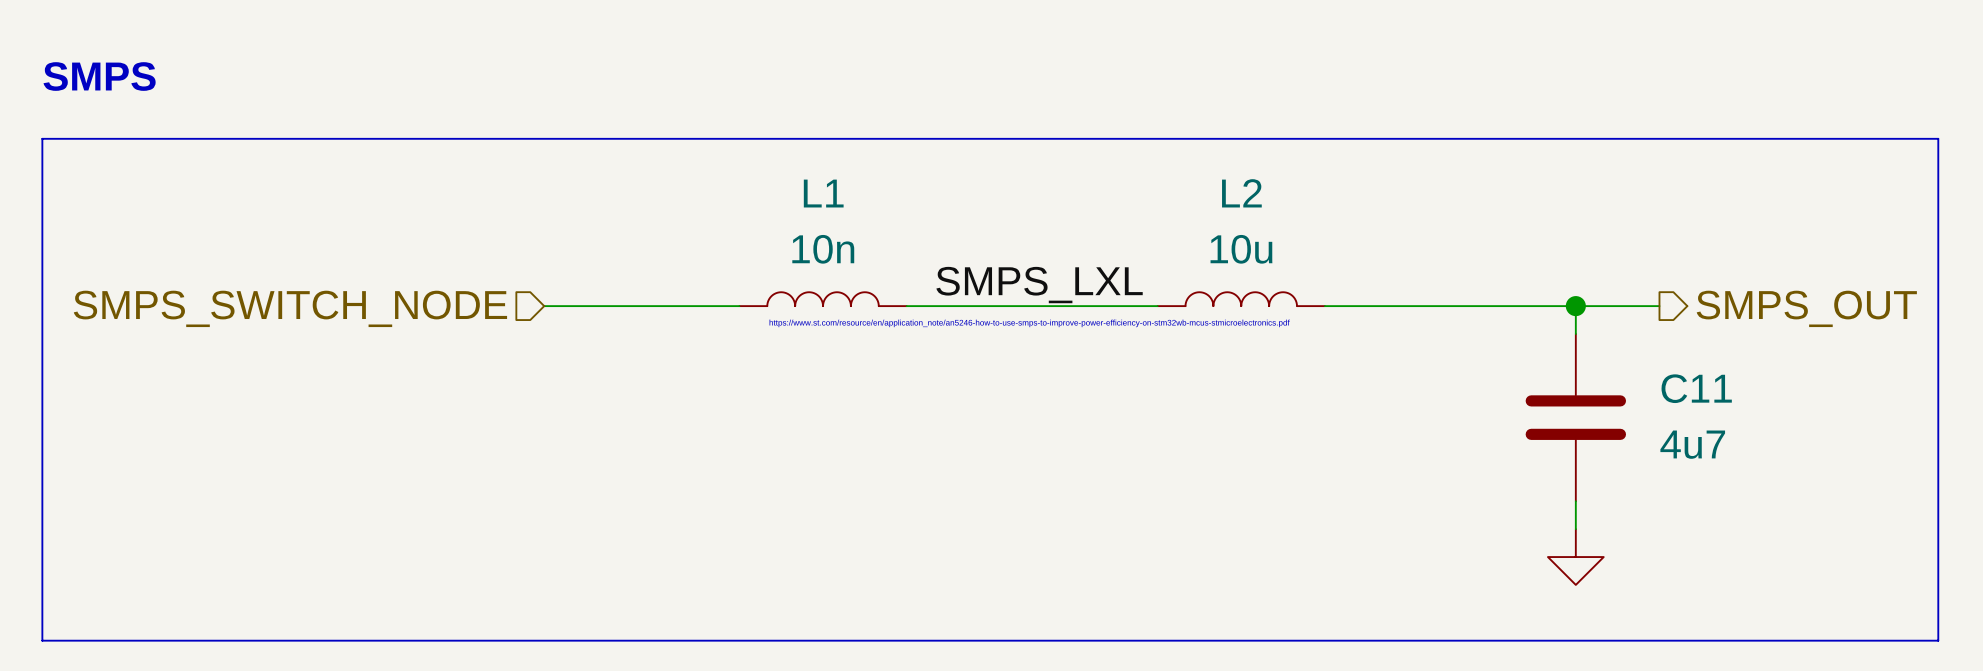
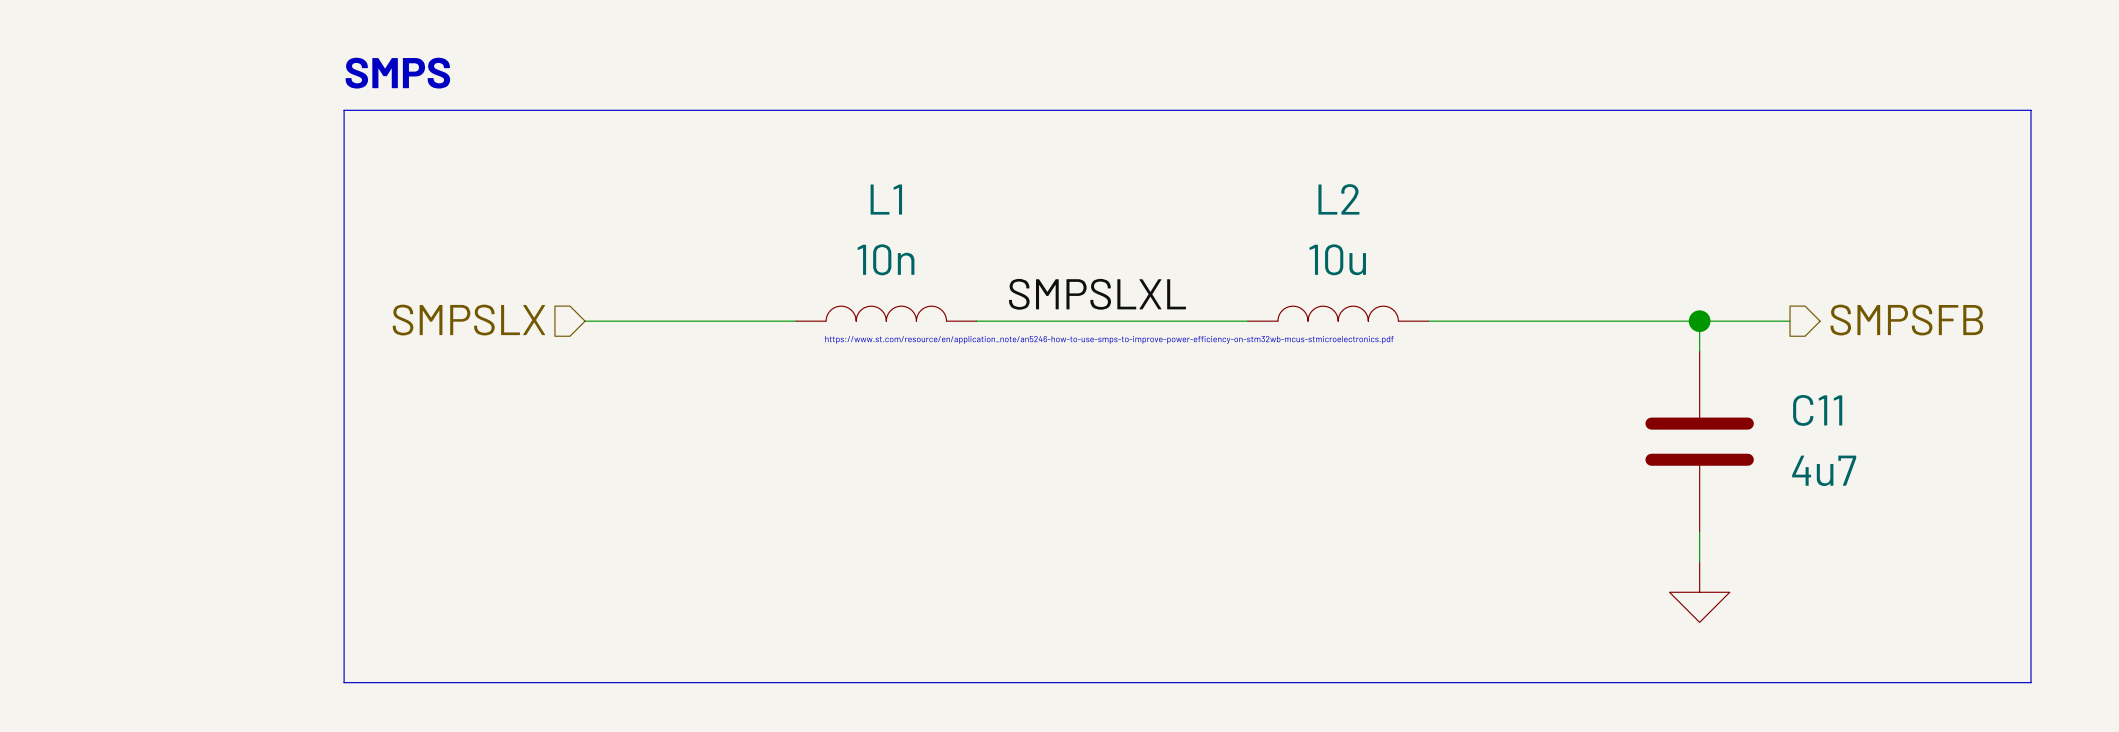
text position: SMPS (99, 76) -> SMPS (397, 73)
label: SMPS_LXL (1039, 285) -> SMPSLXL (1097, 294)
hierarchical label: SMPS_SWITCH_NODE (290, 308) -> SMPSLX (468, 320)
hierarchical label: SMPS_OUT (1806, 308) -> SMPSFB (1906, 320)
line: (321, 640) (42, 640) (42, 138) (1938, 138) (1938, 640) (1882, 640) -> (344, 682) (344, 110) (2031, 110) (2031, 682)

